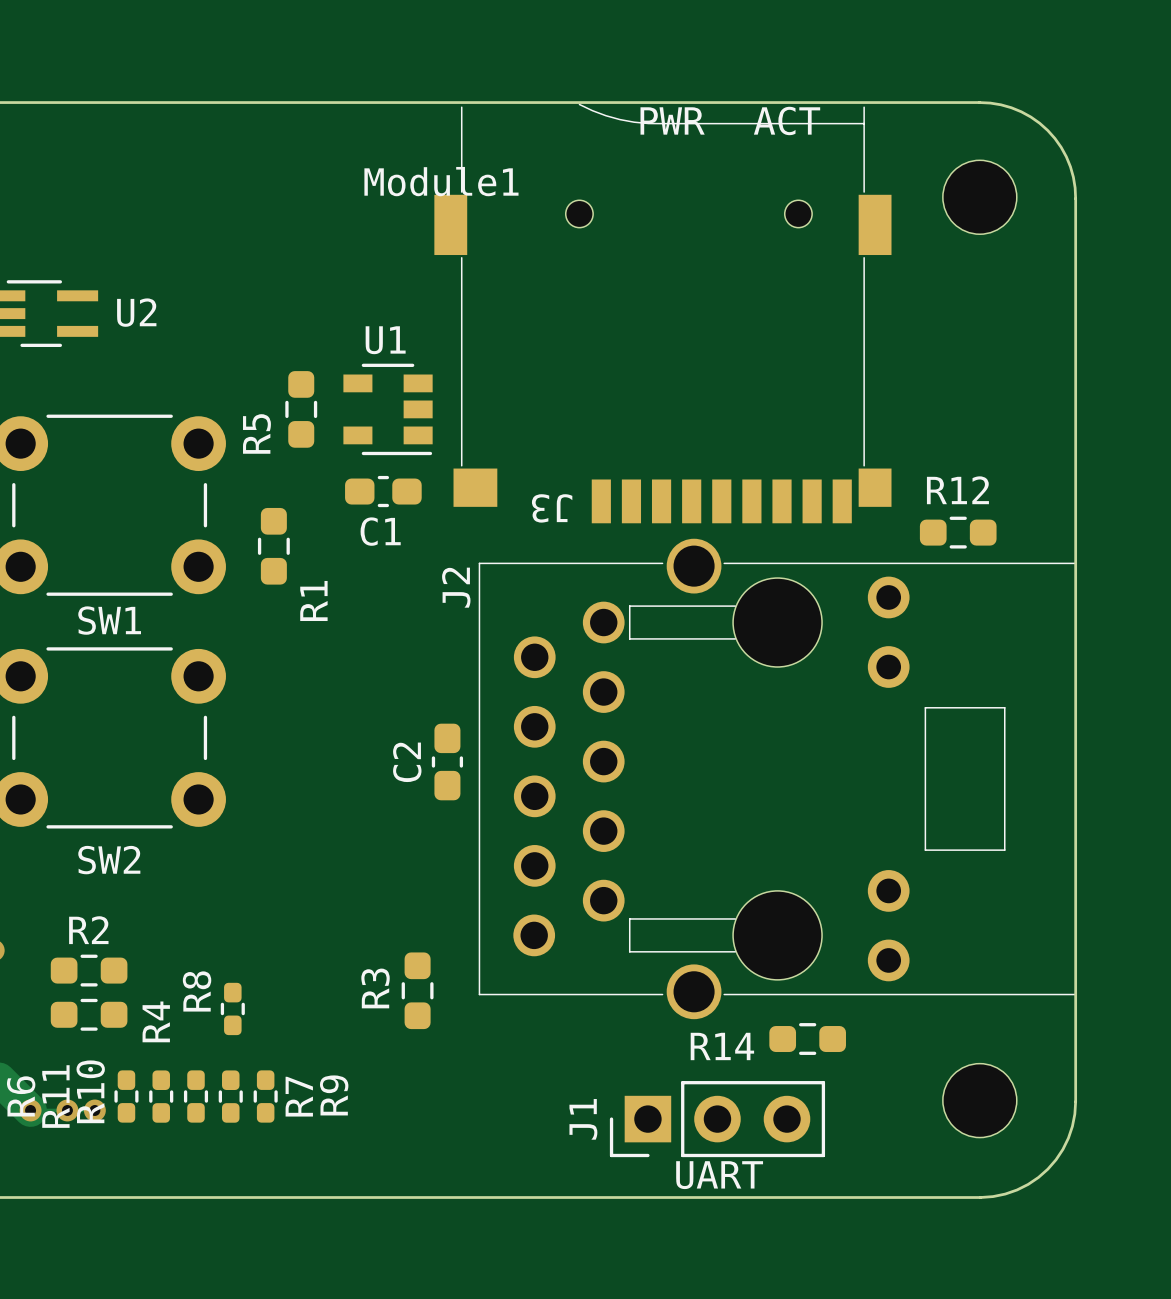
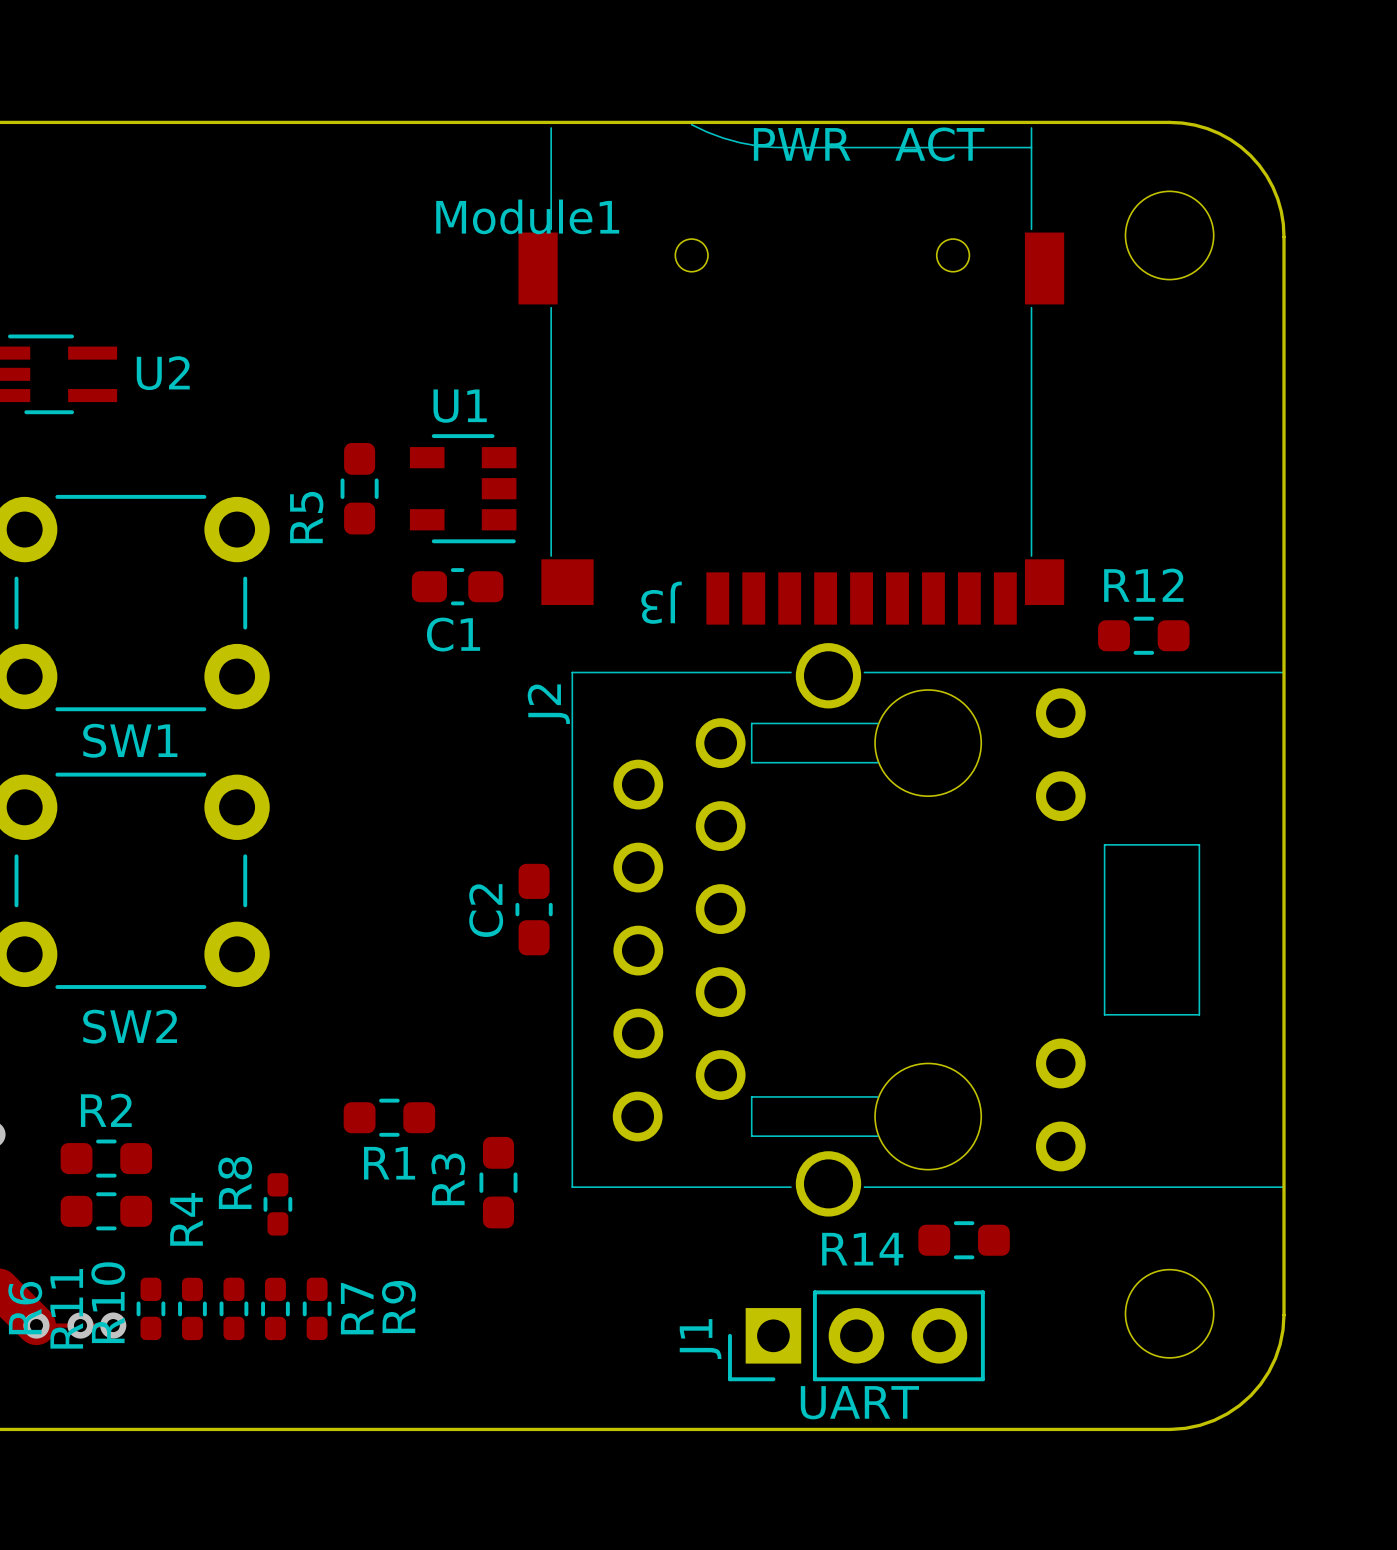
R1 rotation: 0° (273, 546) -> 90° clockwise (389, 1117)
R1 position: (273, 546) -> (389, 1117)

